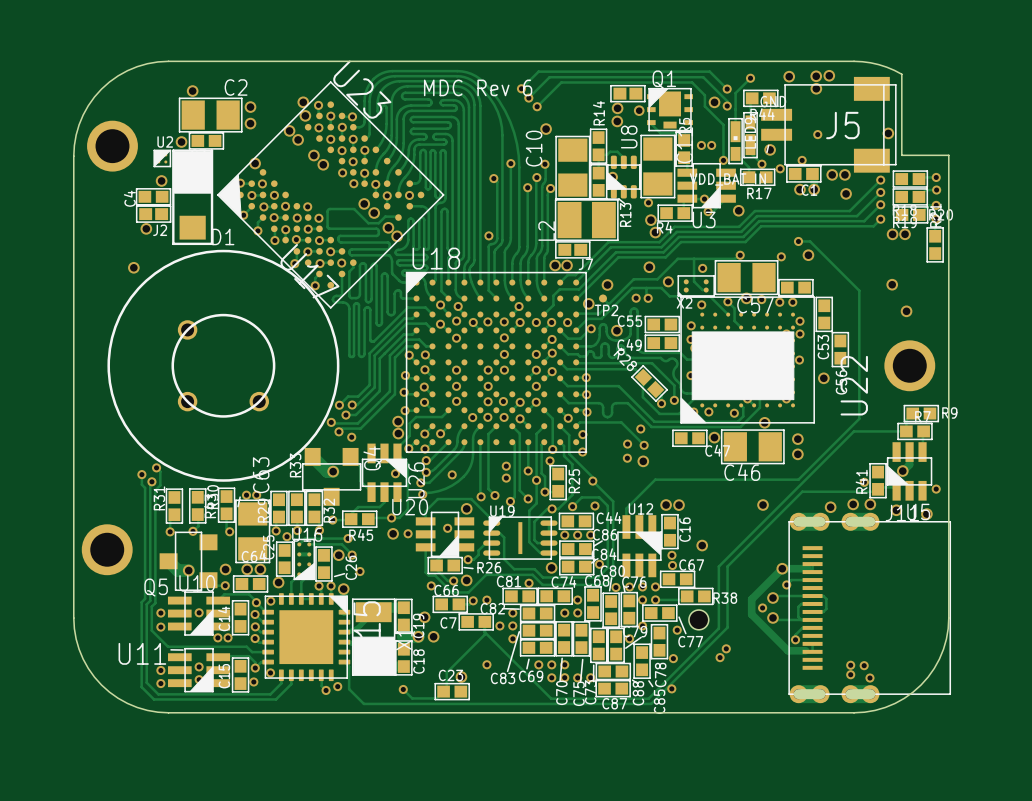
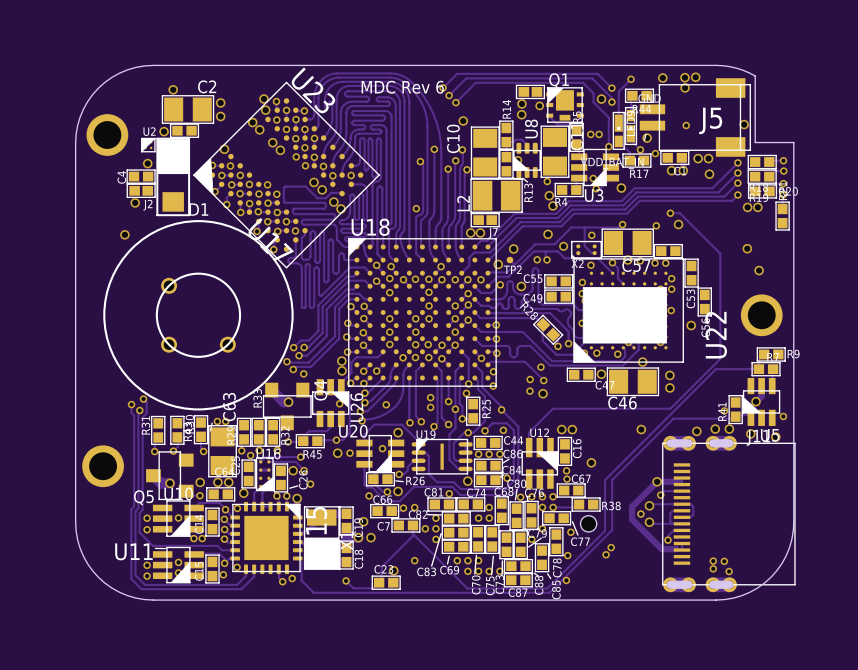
via: (802, 160) -> none

